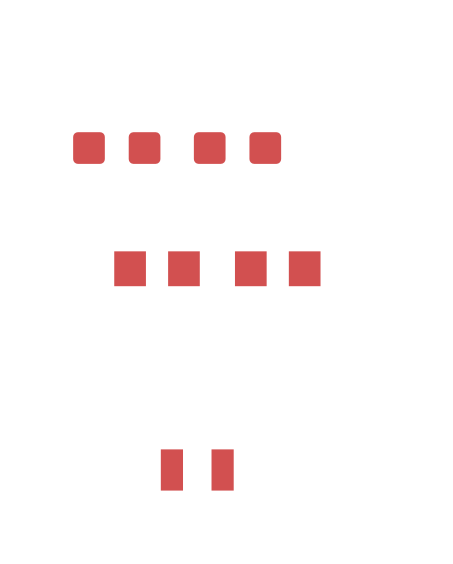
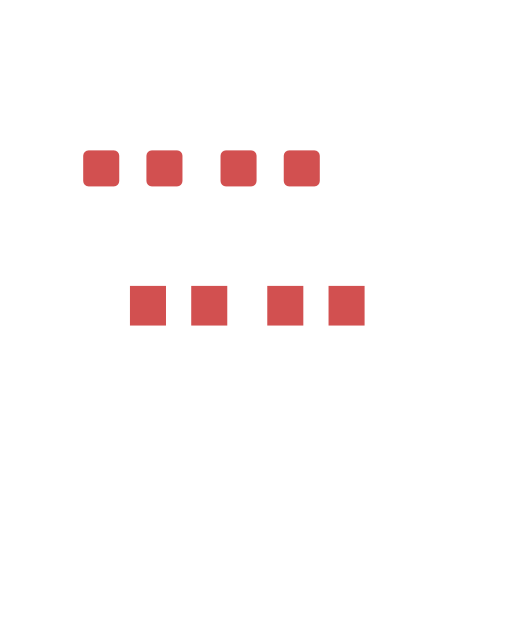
part: (197, 469) -> none

